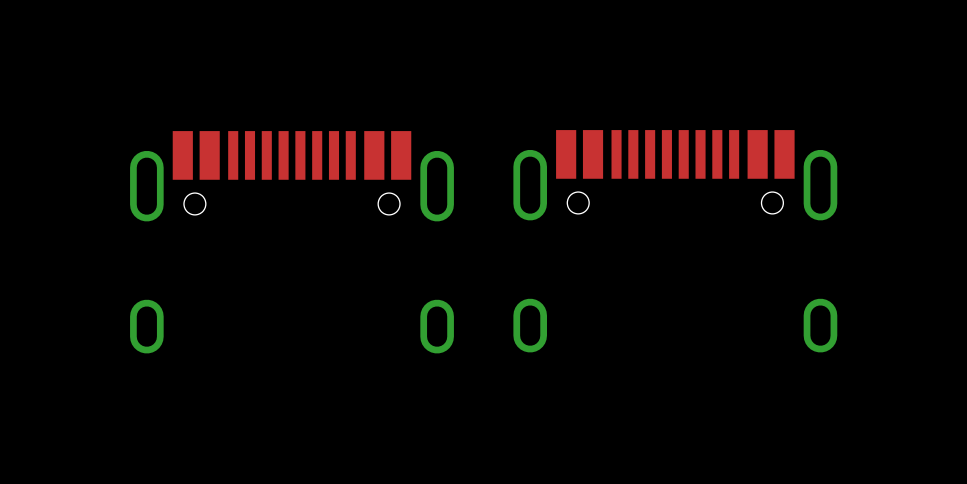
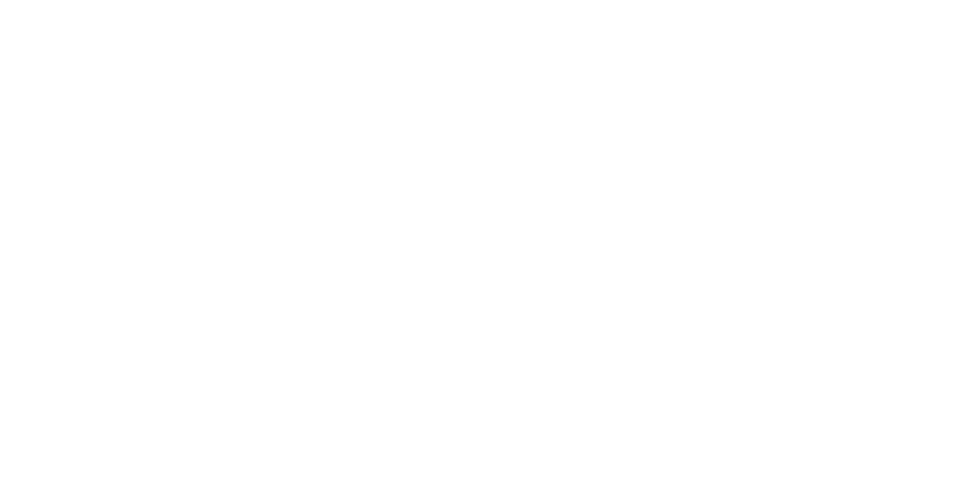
part: (675, 241) -> none
part: (291, 242) -> none

